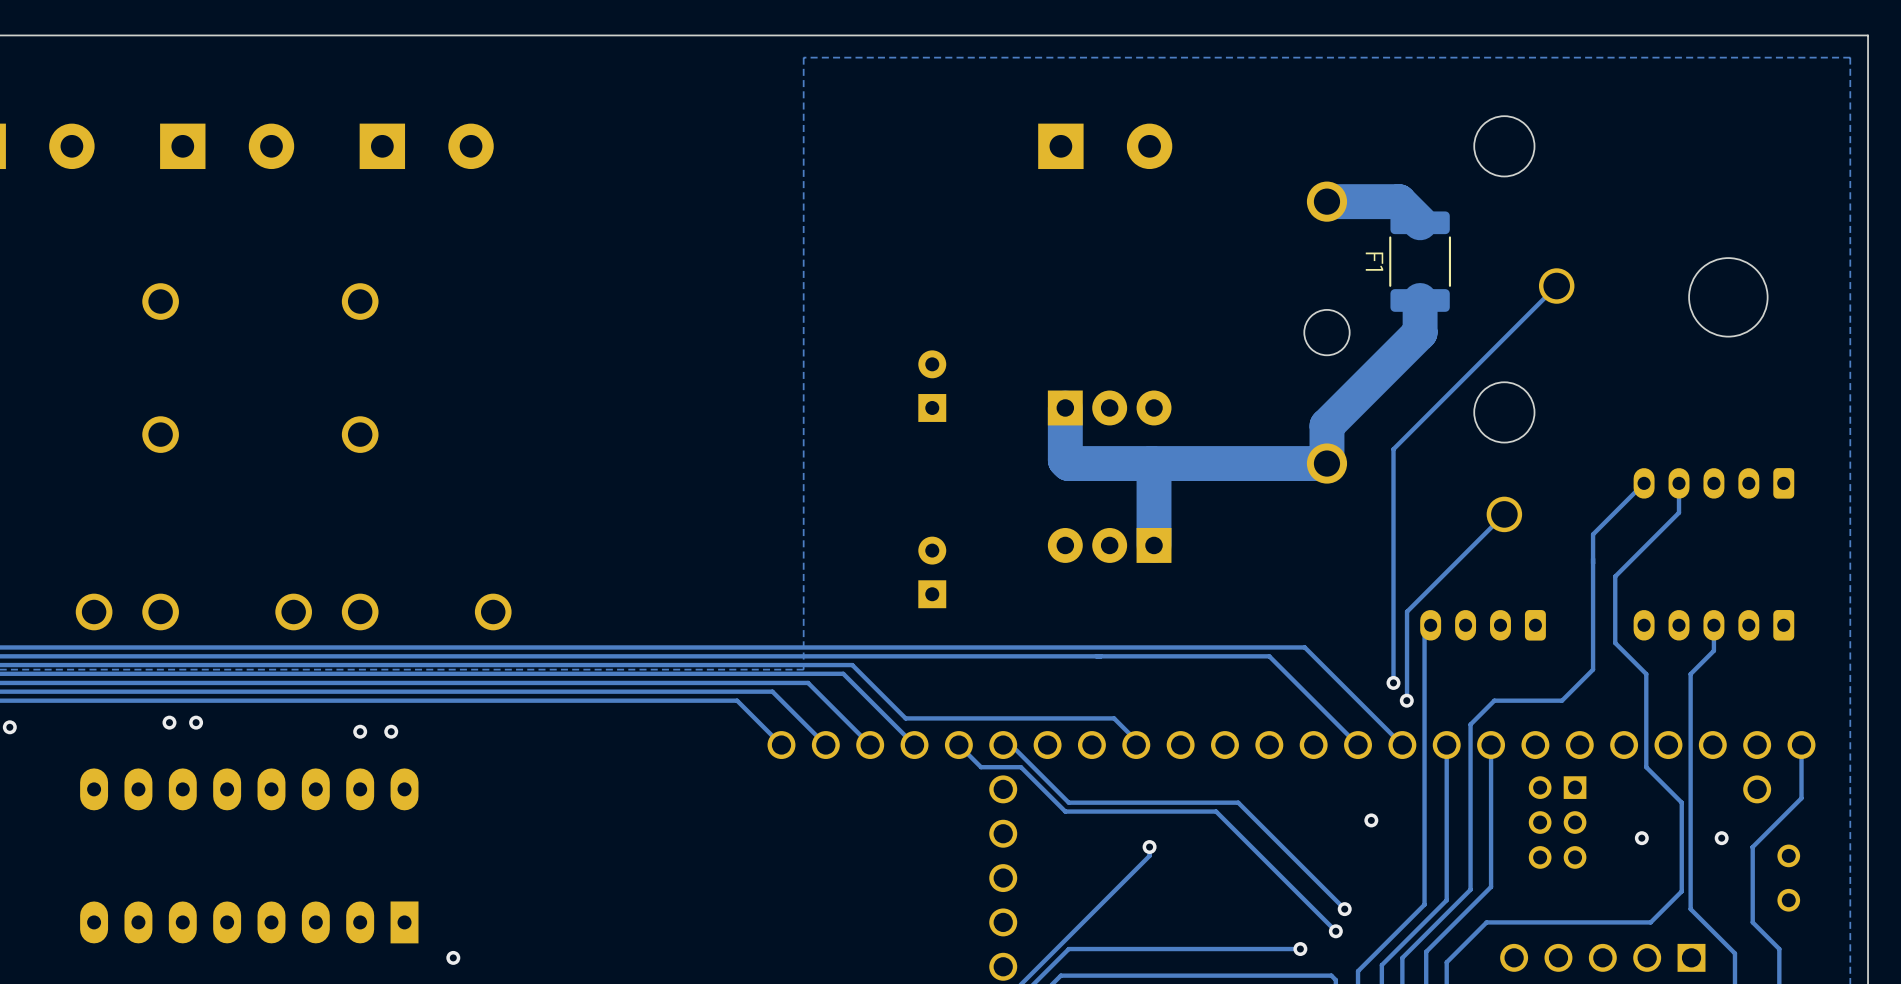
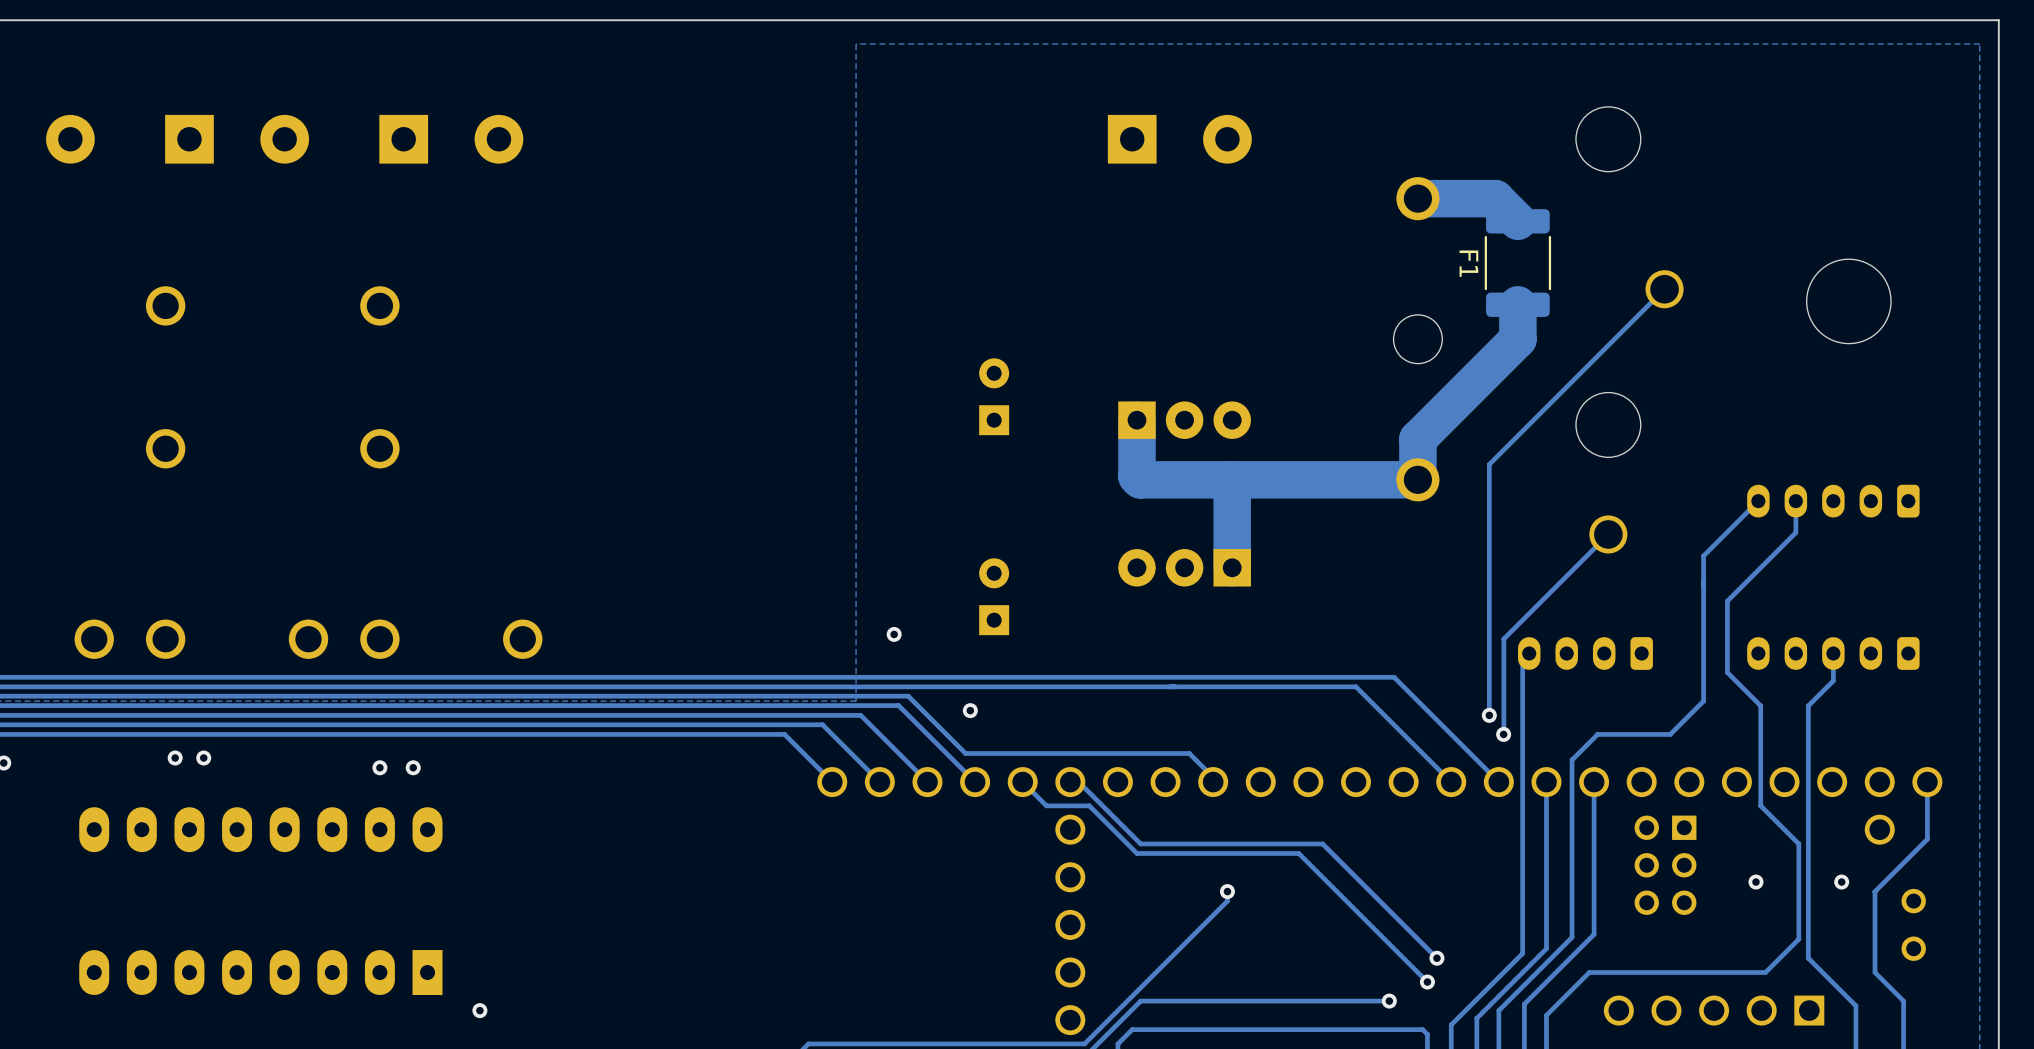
via: none -> (894, 634)
via: none -> (970, 710)
via: (1371, 820) -> none

